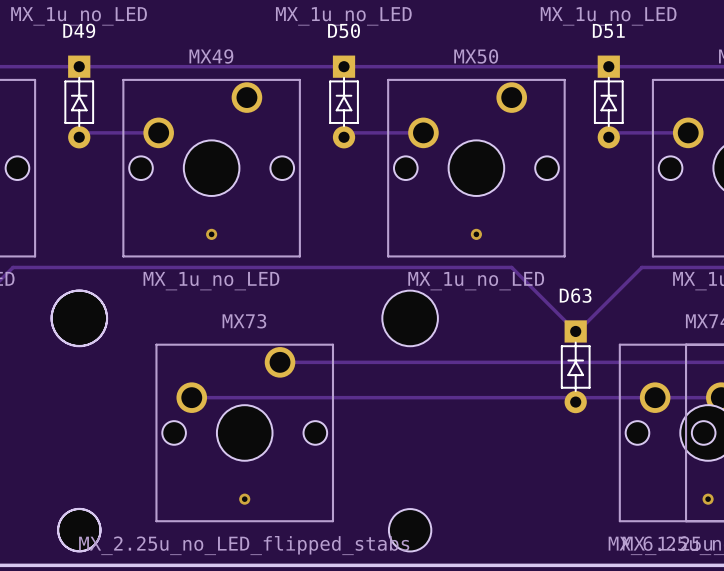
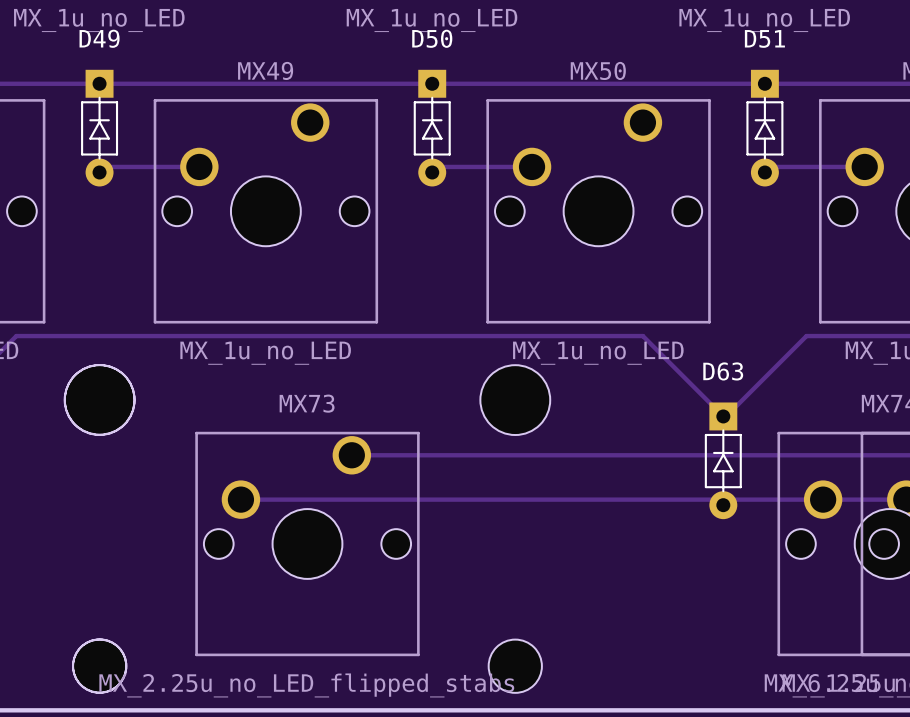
via: (211, 234) -> none
via: (476, 234) -> none
via: (244, 499) -> none
via: (708, 499) -> none

